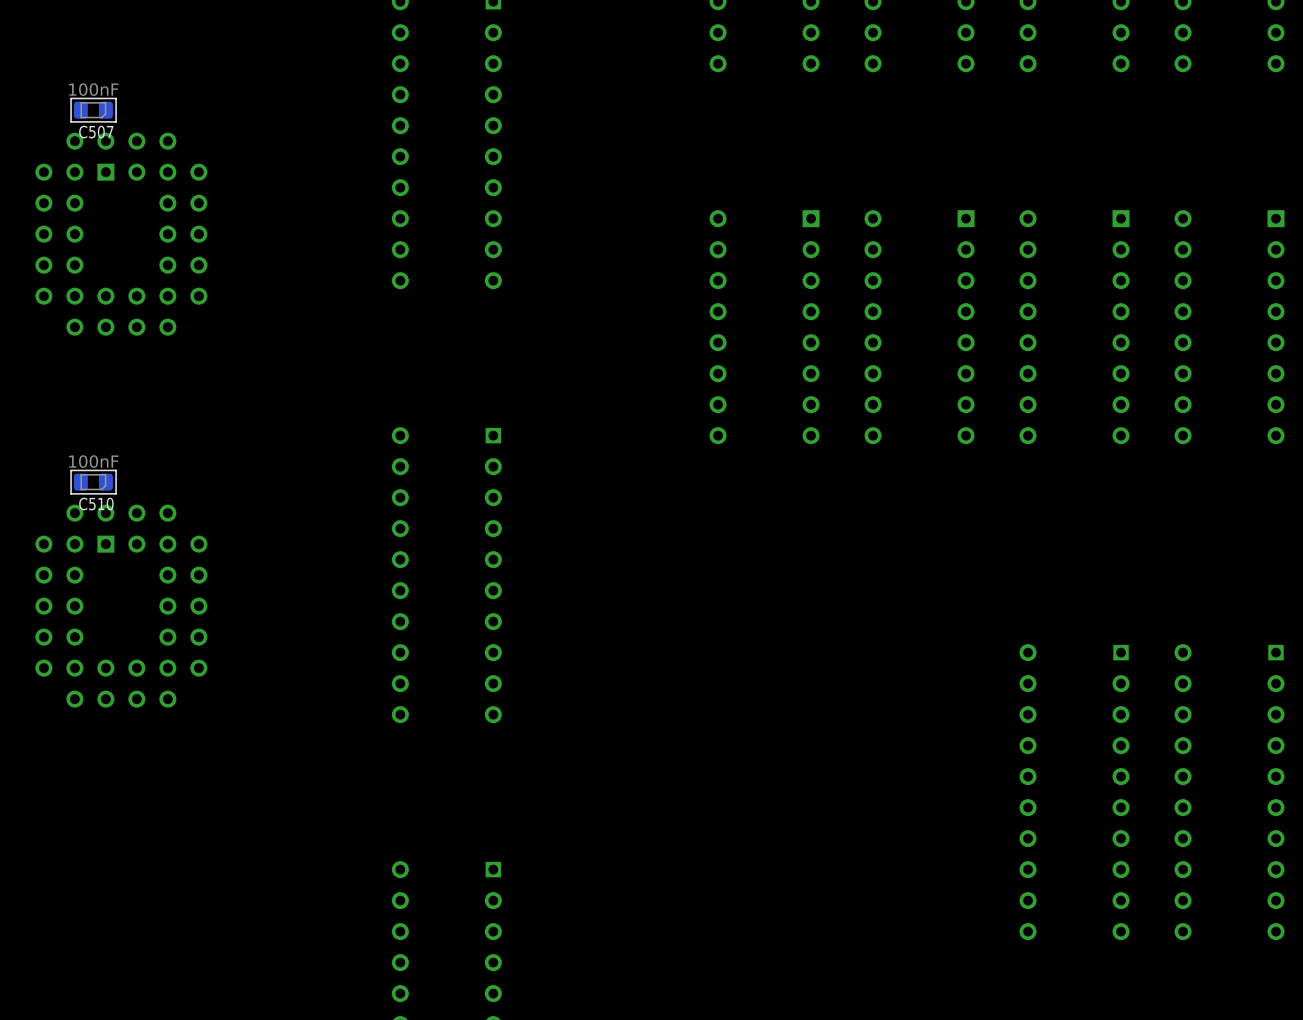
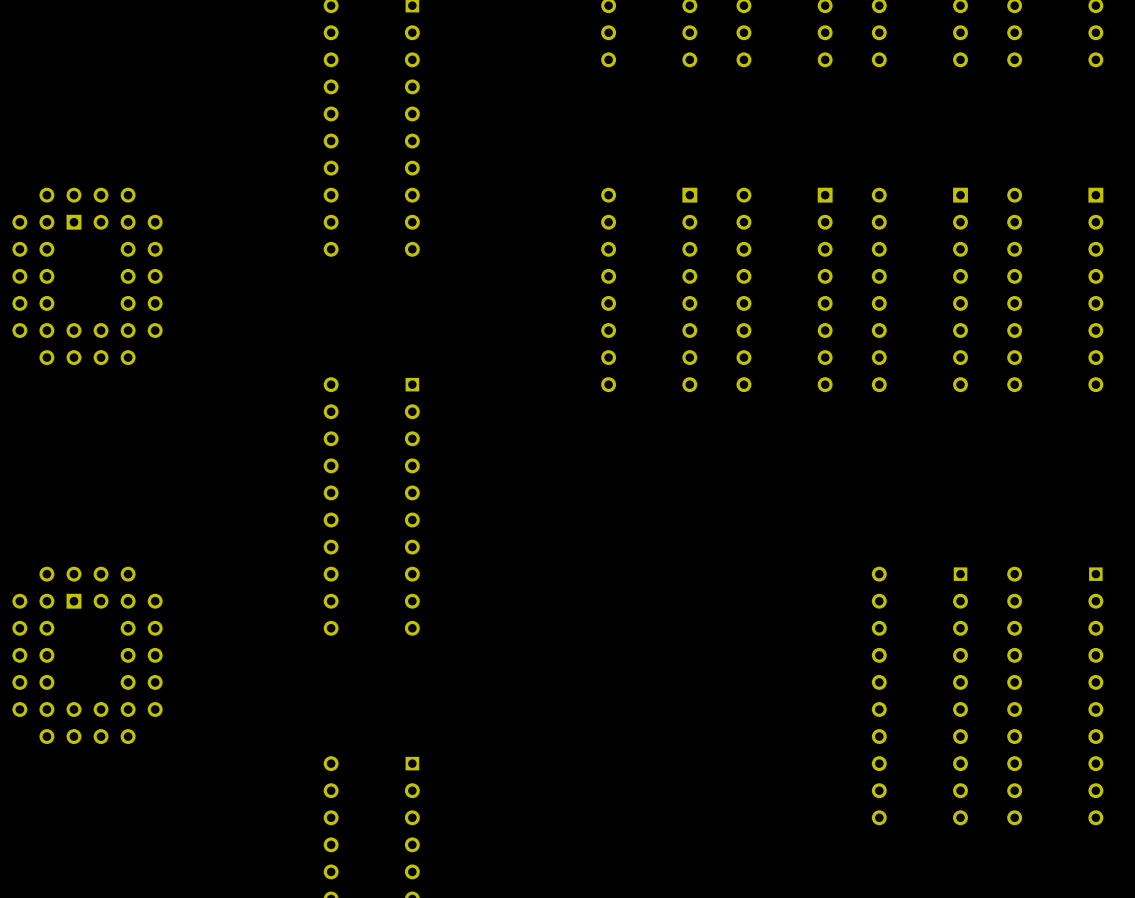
C507: 100nF (93, 110) -> none
part position: (121, 234) -> (87, 276)
C510: 100nF (93, 482) -> none
part position: (121, 606) -> (87, 655)

